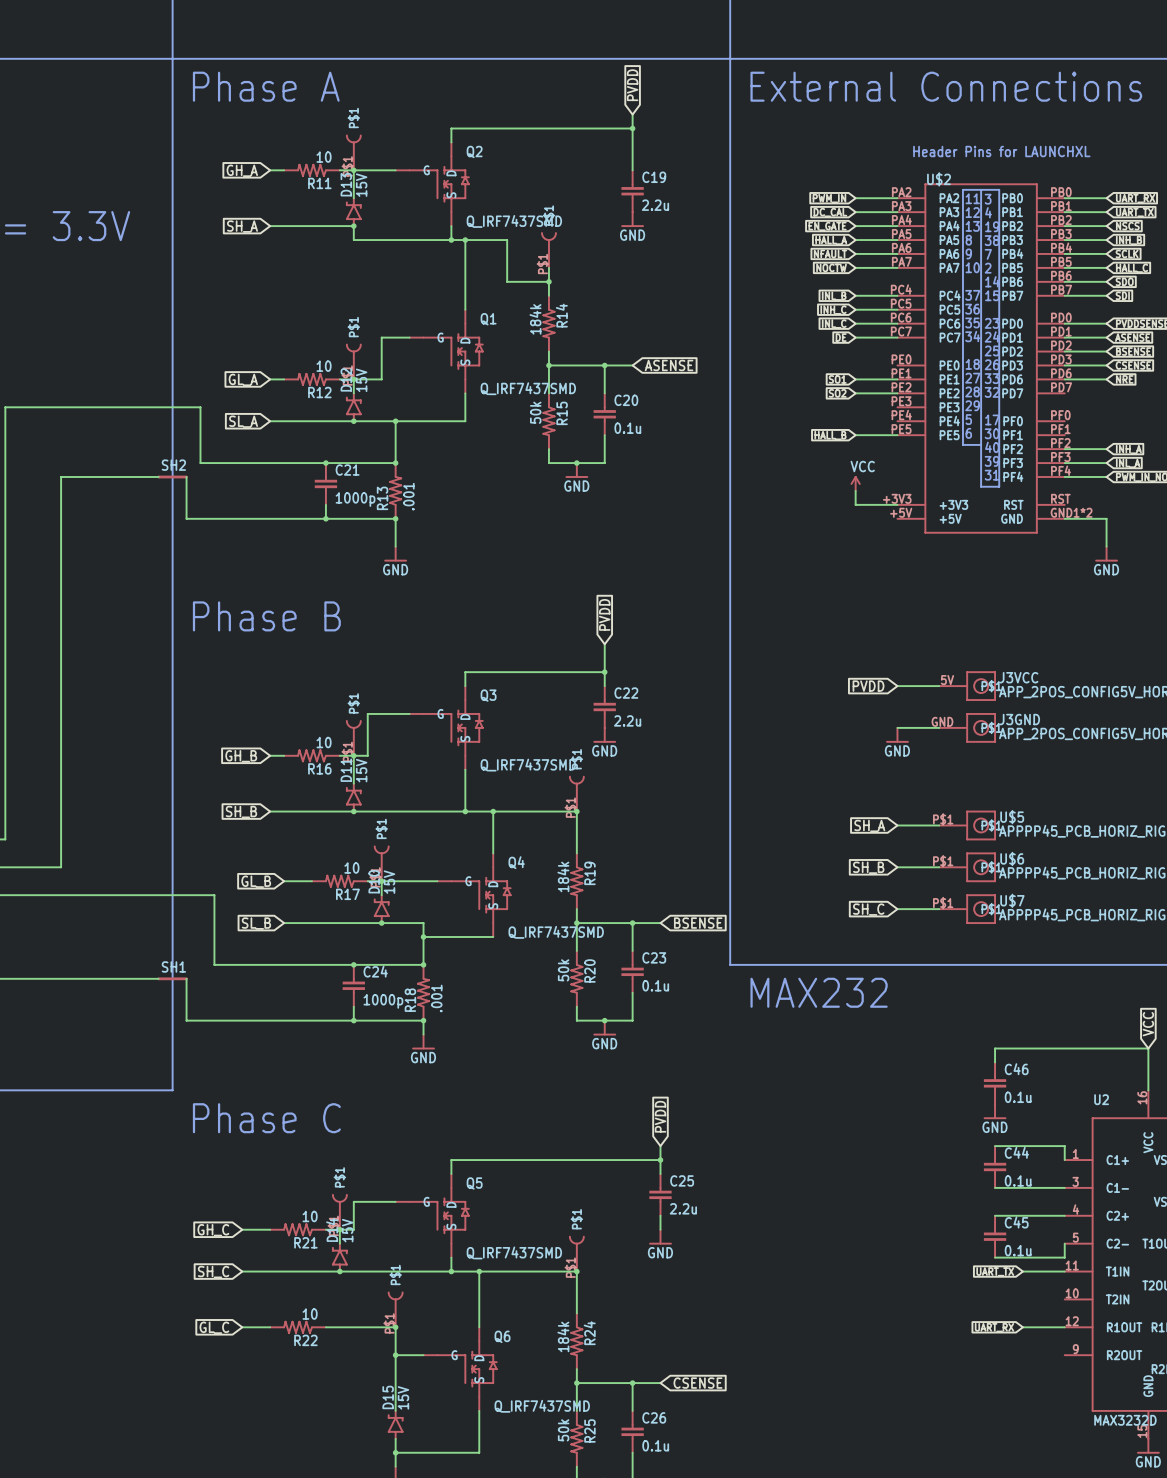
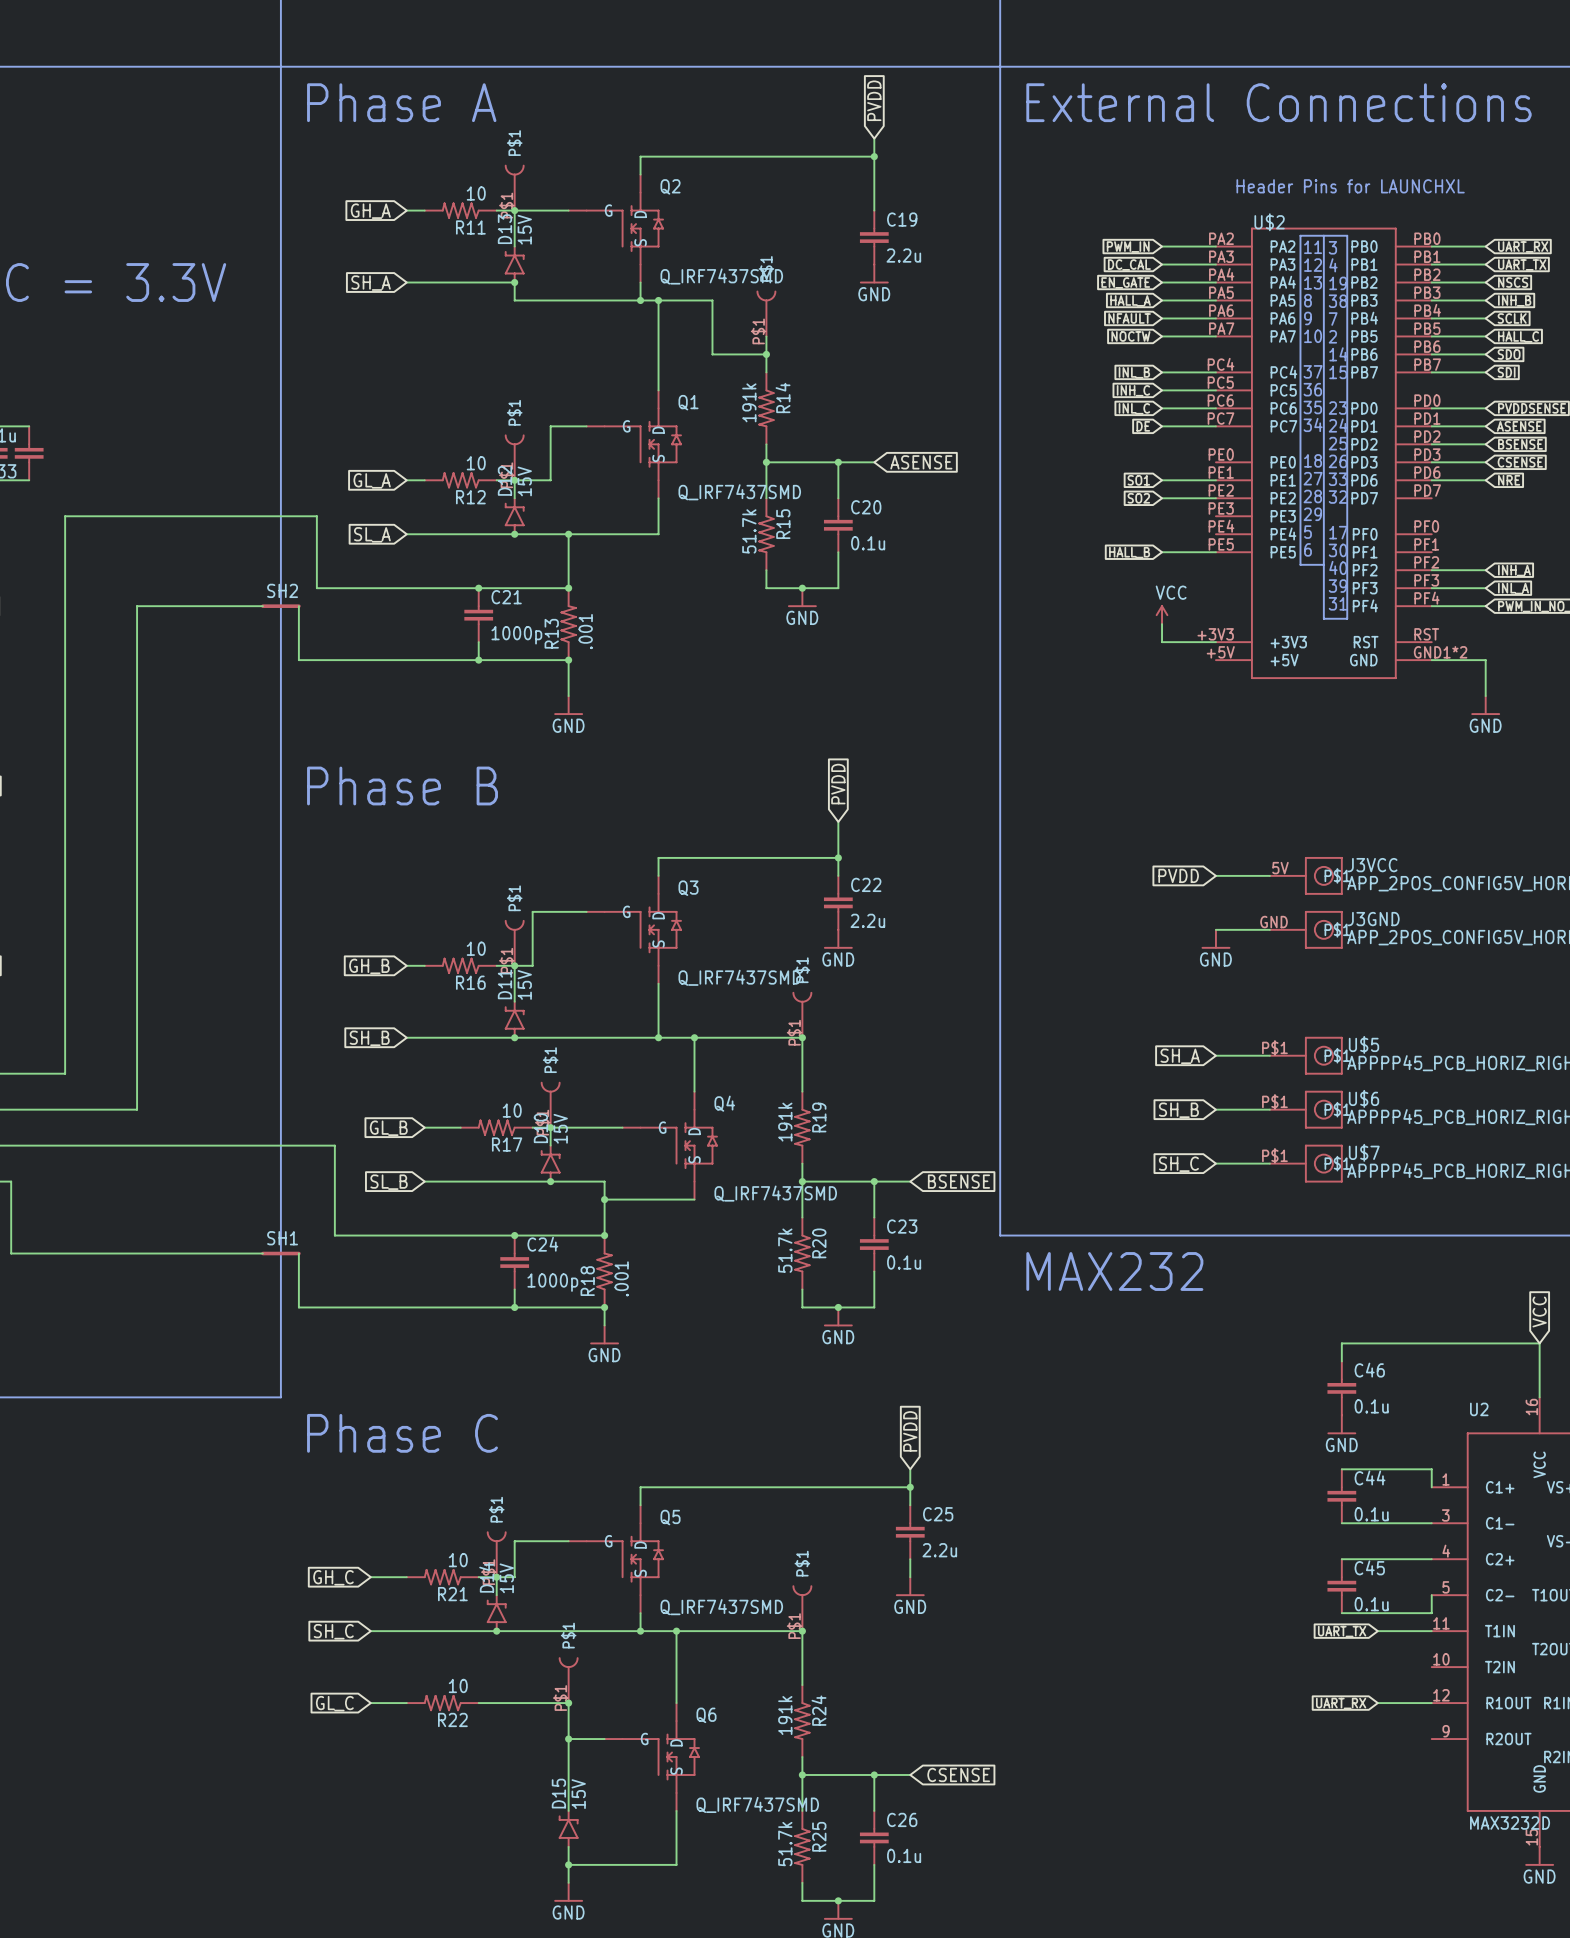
R14 value: 184k (535, 319) -> 191k (749, 402)
R15 value: 50k (535, 412) -> 51.7k (749, 531)
R19 value: 184k (563, 876) -> 191k (785, 1122)
R20 value: 50k (563, 970) -> 51.7k (785, 1250)
R24 value: 184k (563, 1336) -> 191k (785, 1715)
R25 value: 50k (563, 1430) -> 51.7k (785, 1844)

